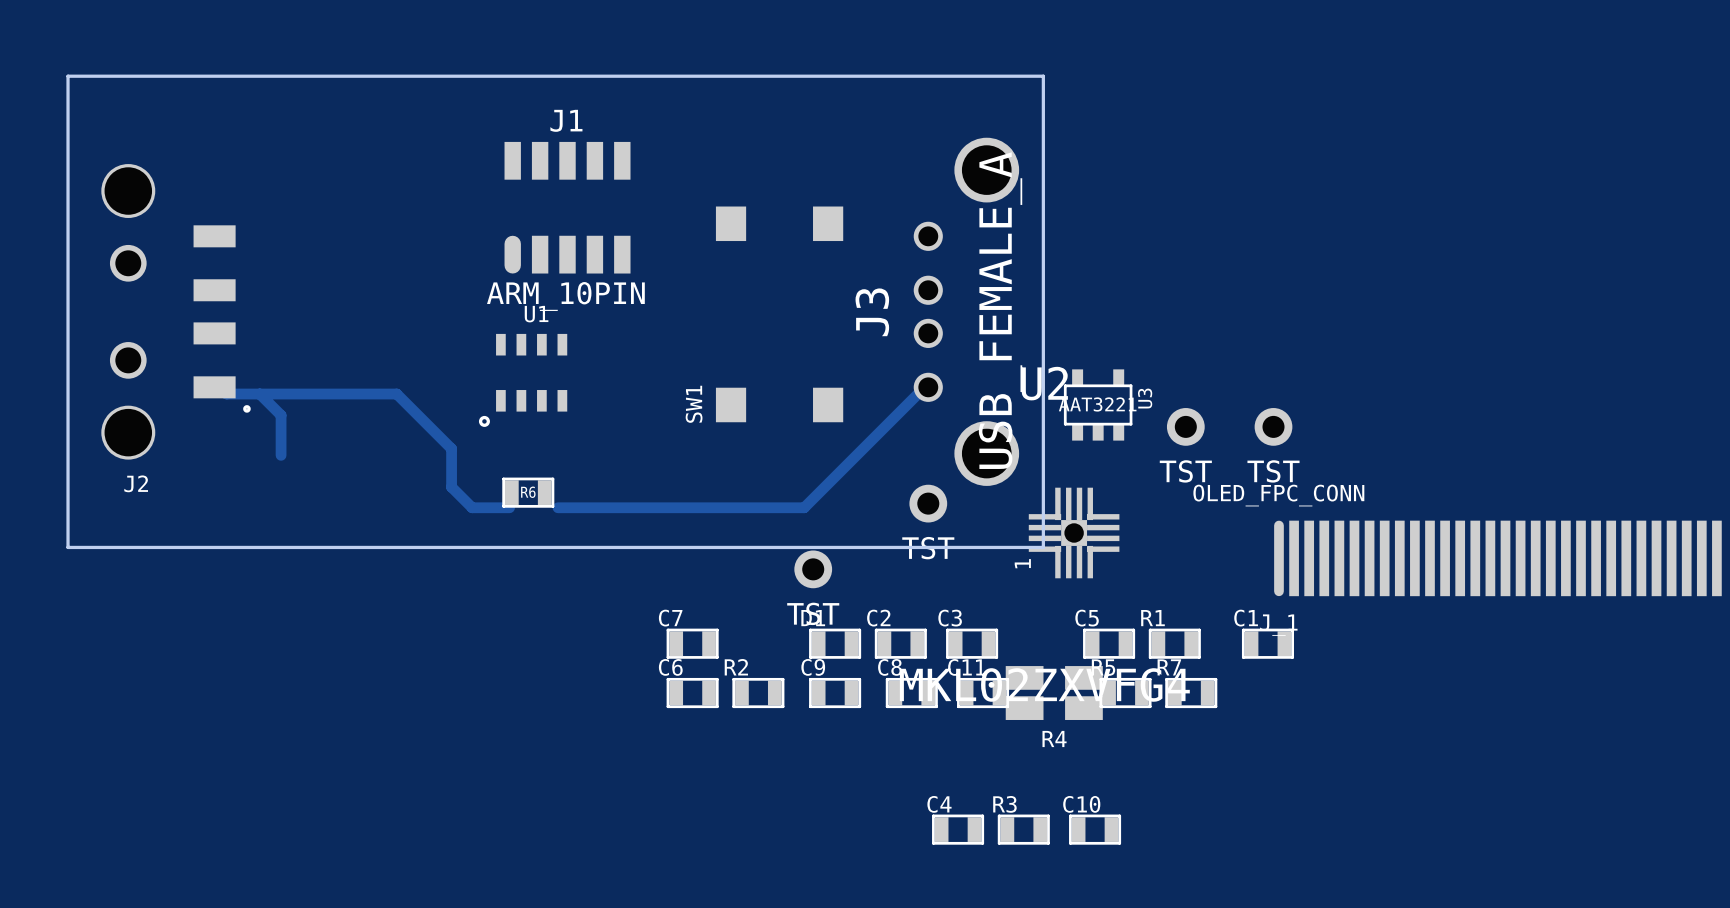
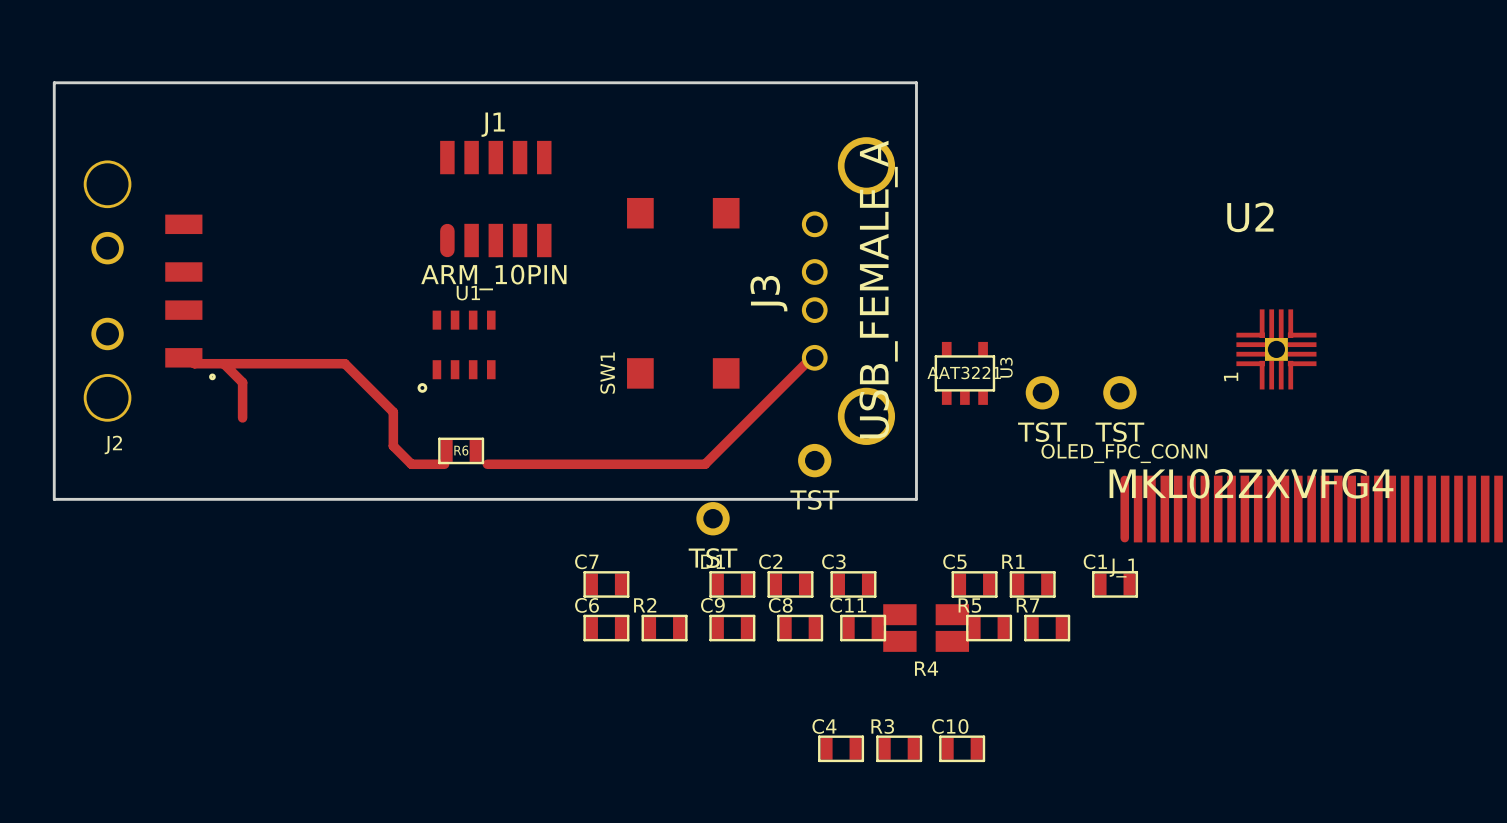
U2 position: (1074, 532) -> (1276, 349)

